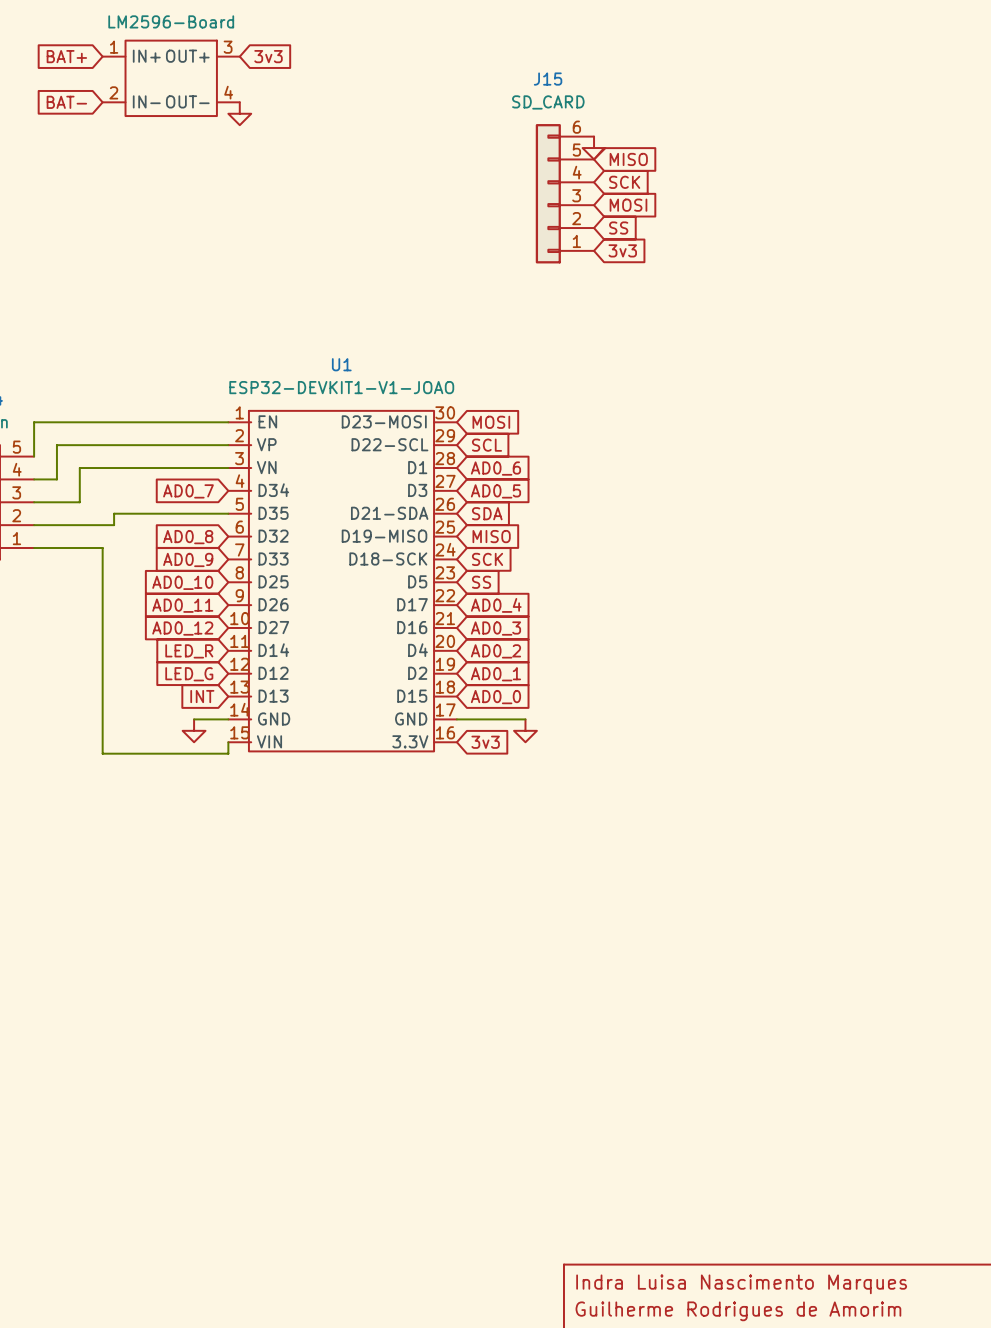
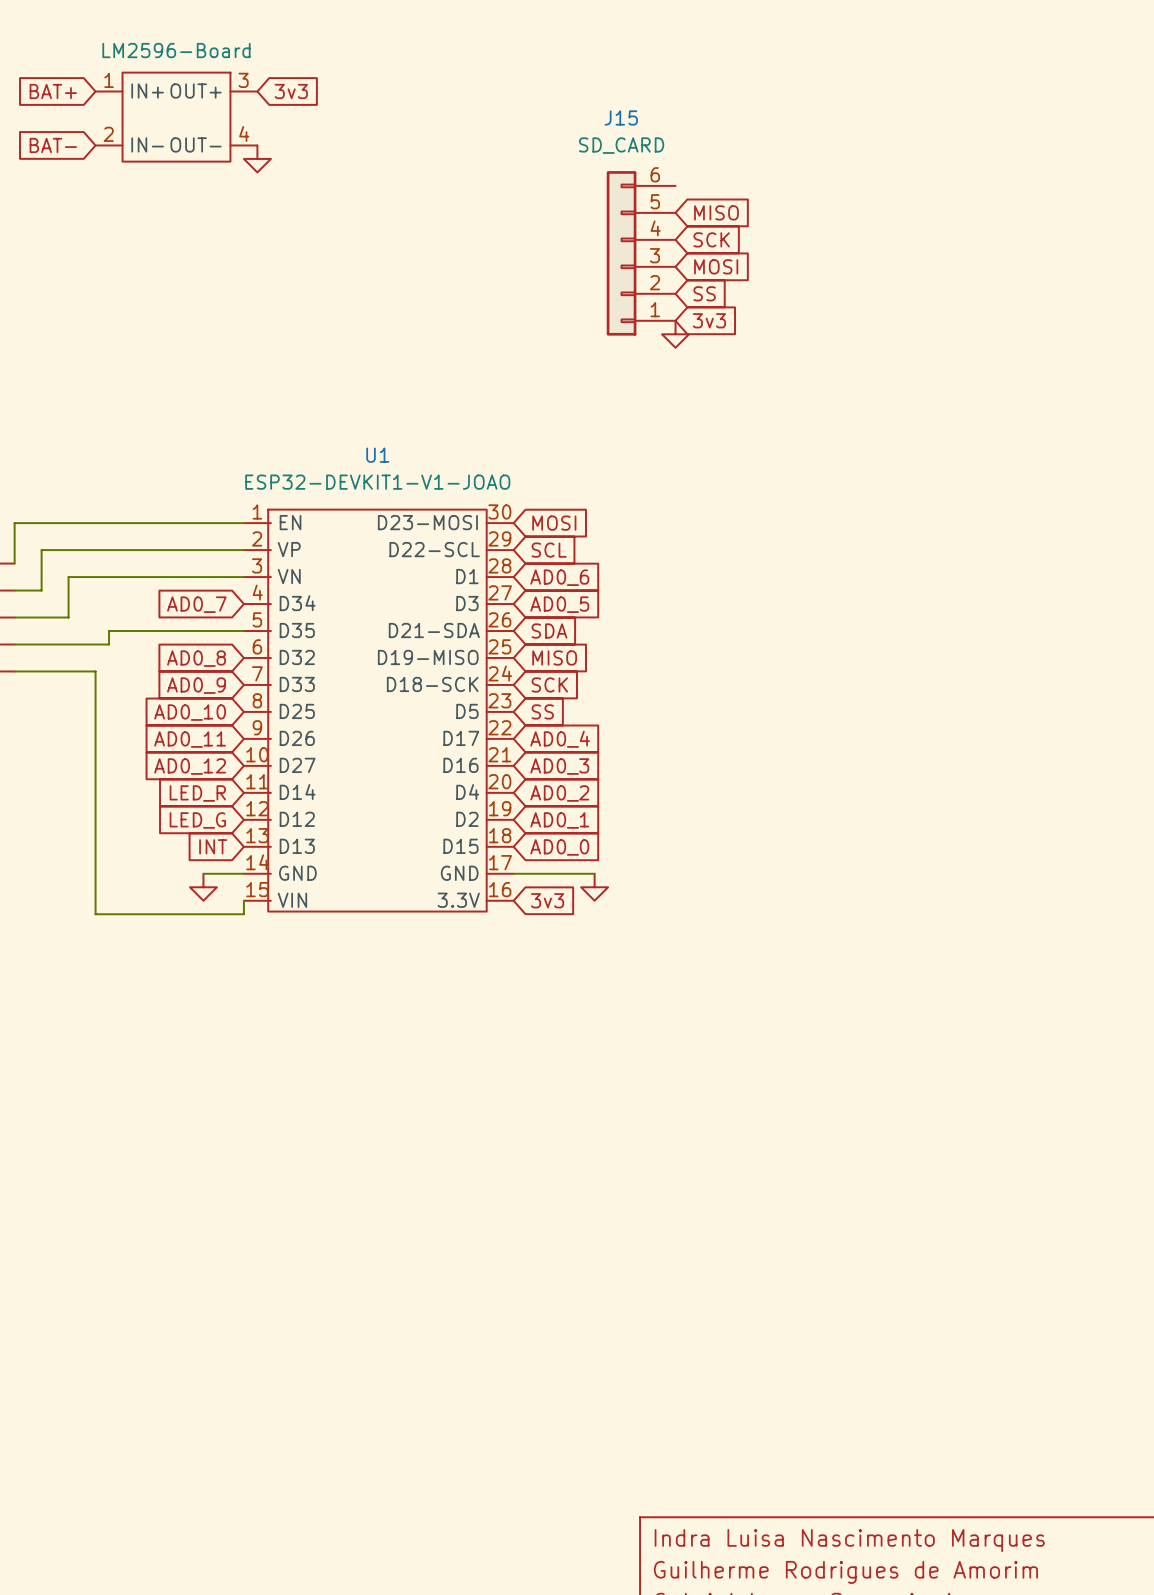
power symbol position: (594, 148) -> (675, 334)

